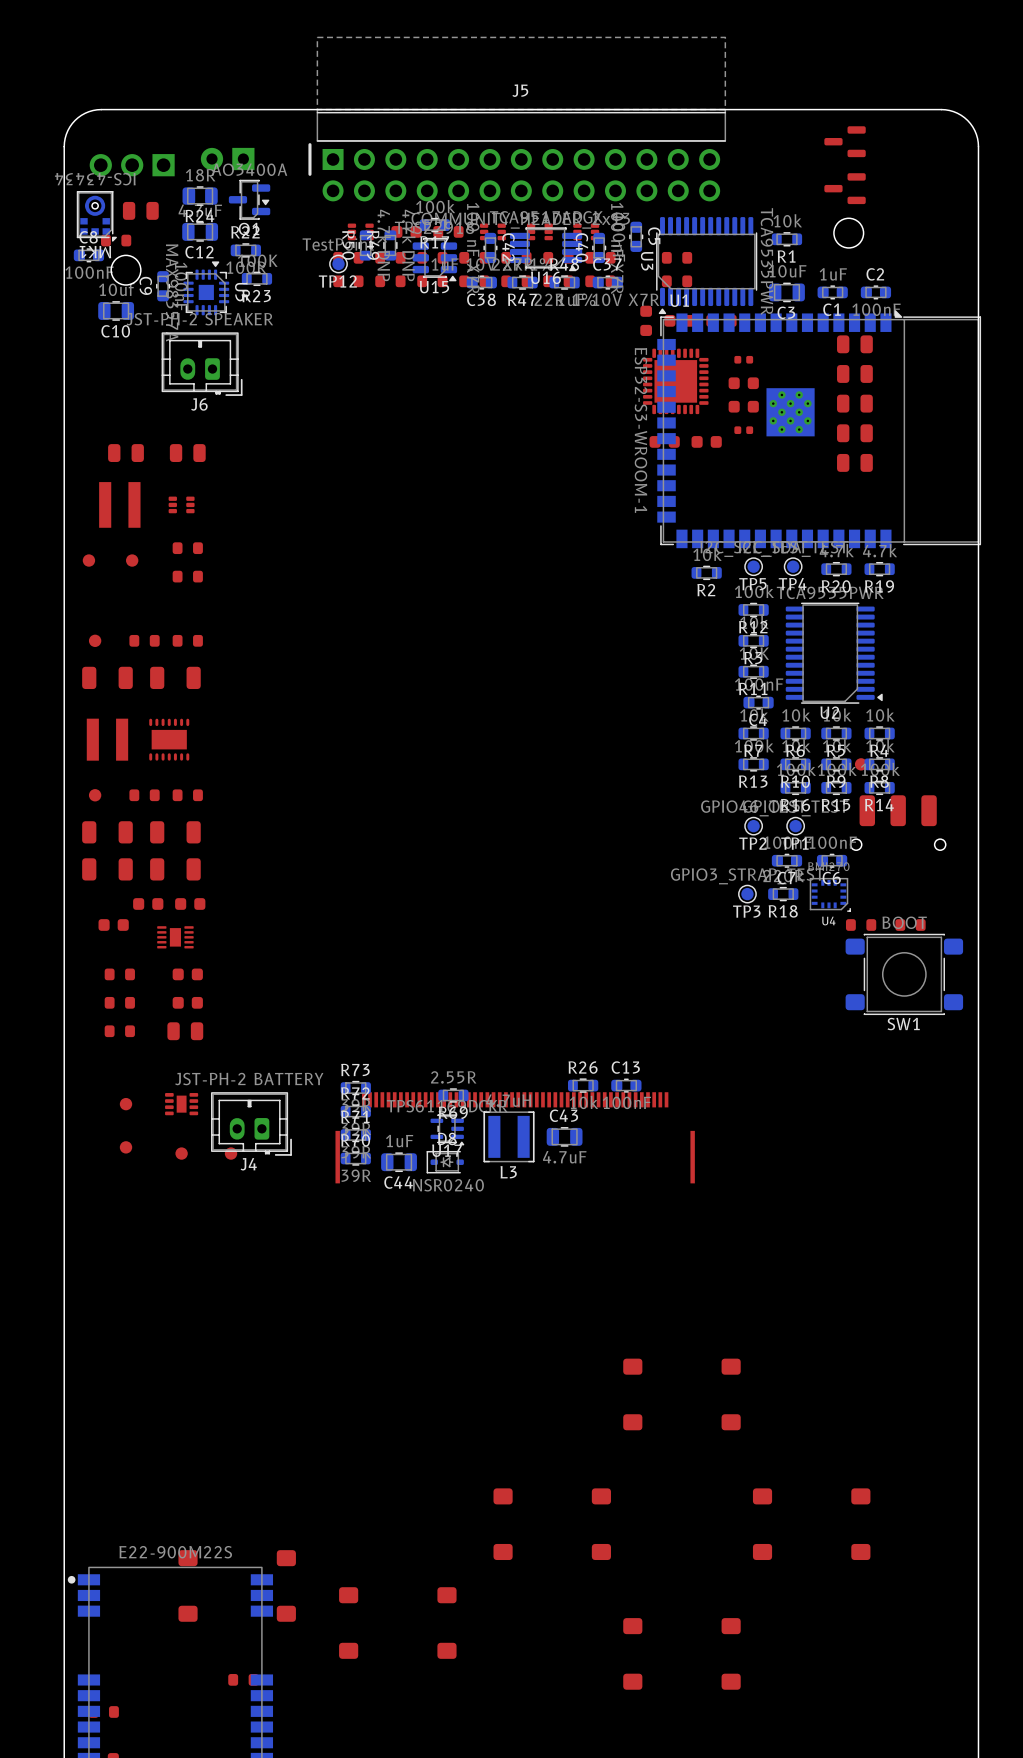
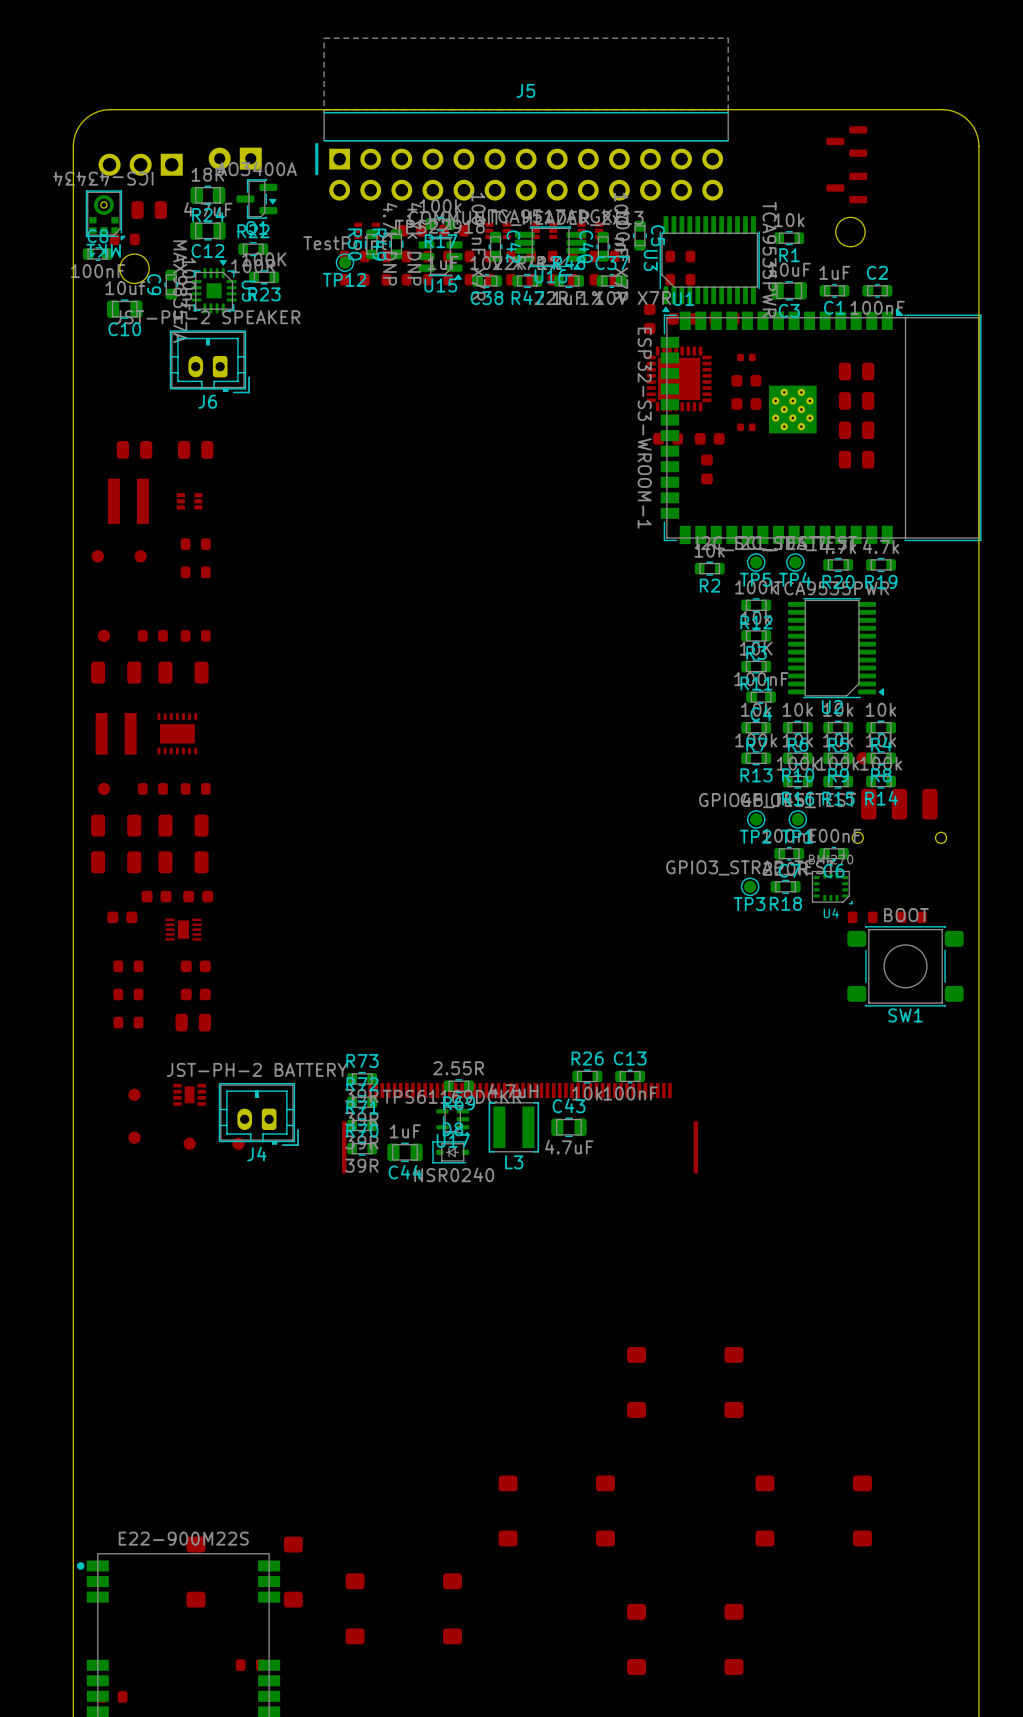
part: (854, 344) -> none
part: none -> (706, 469)

